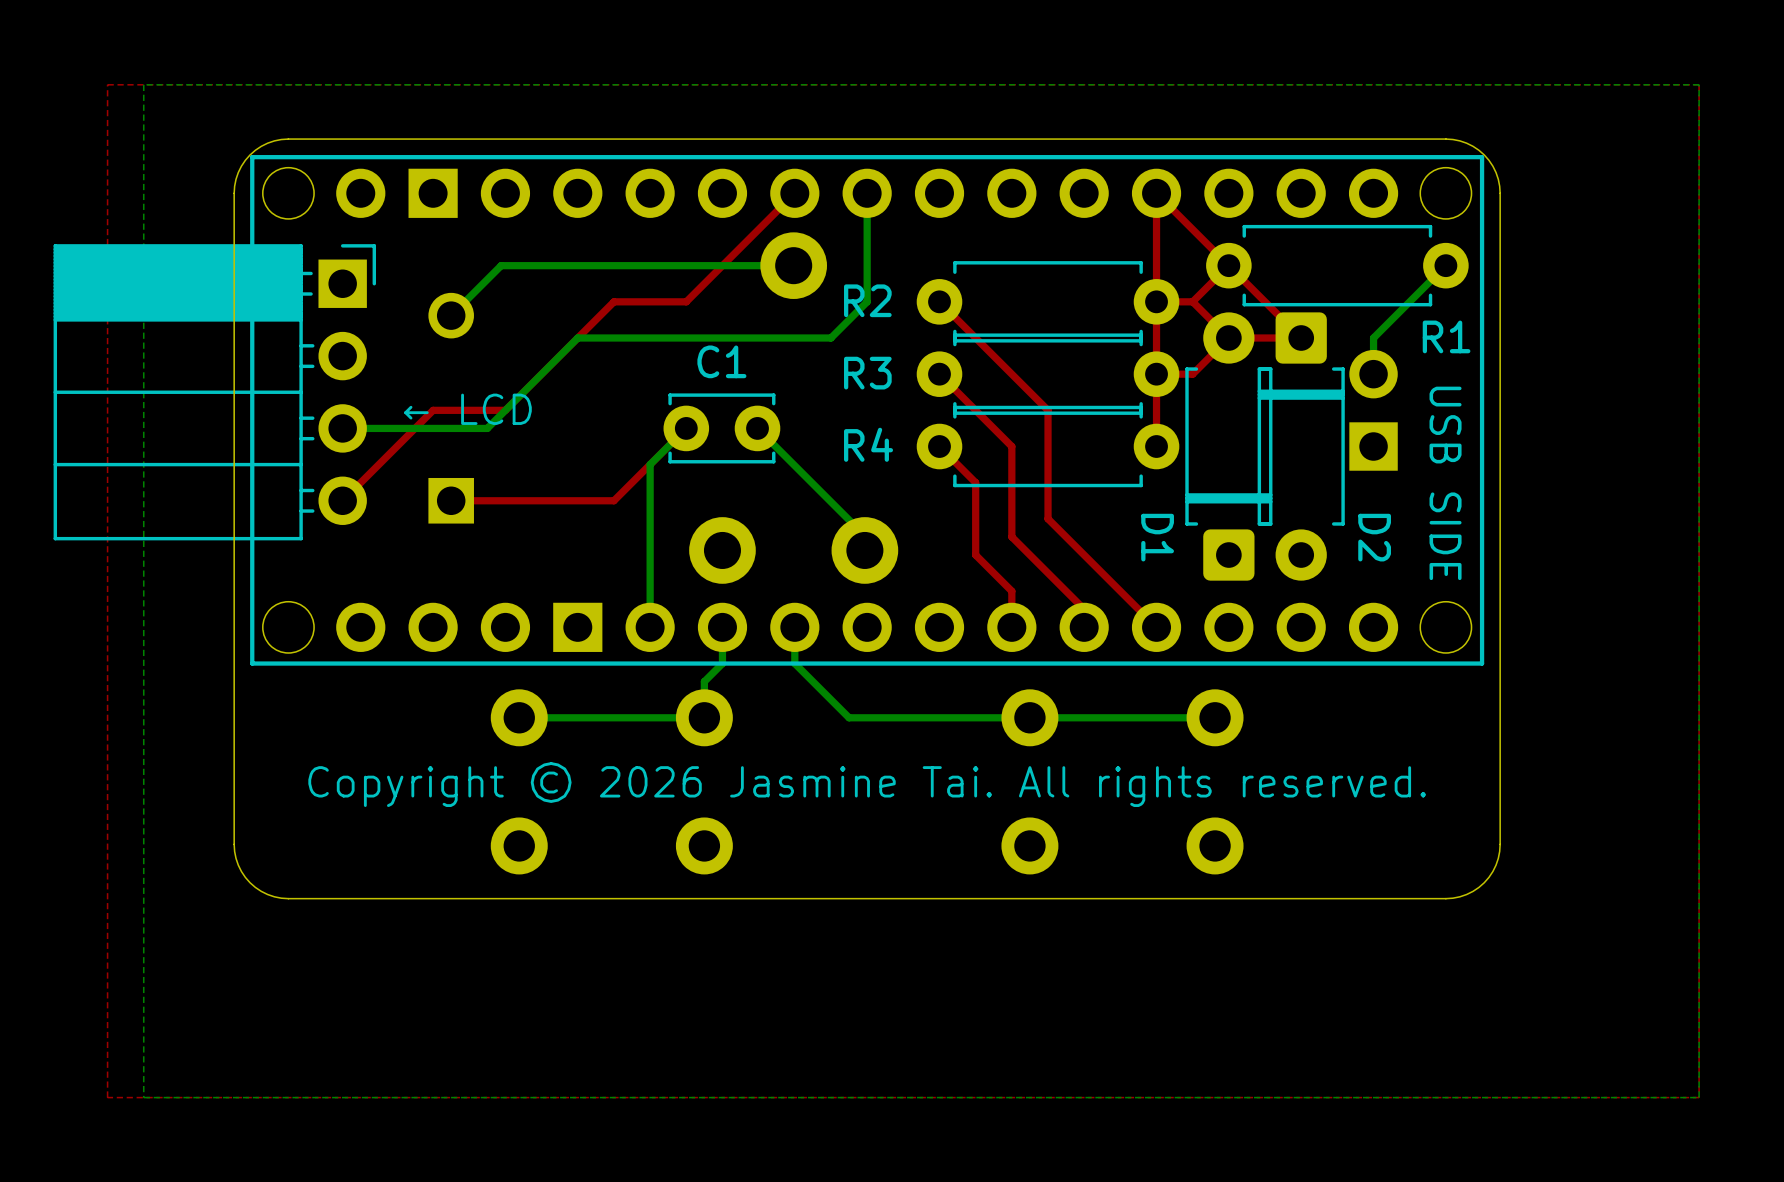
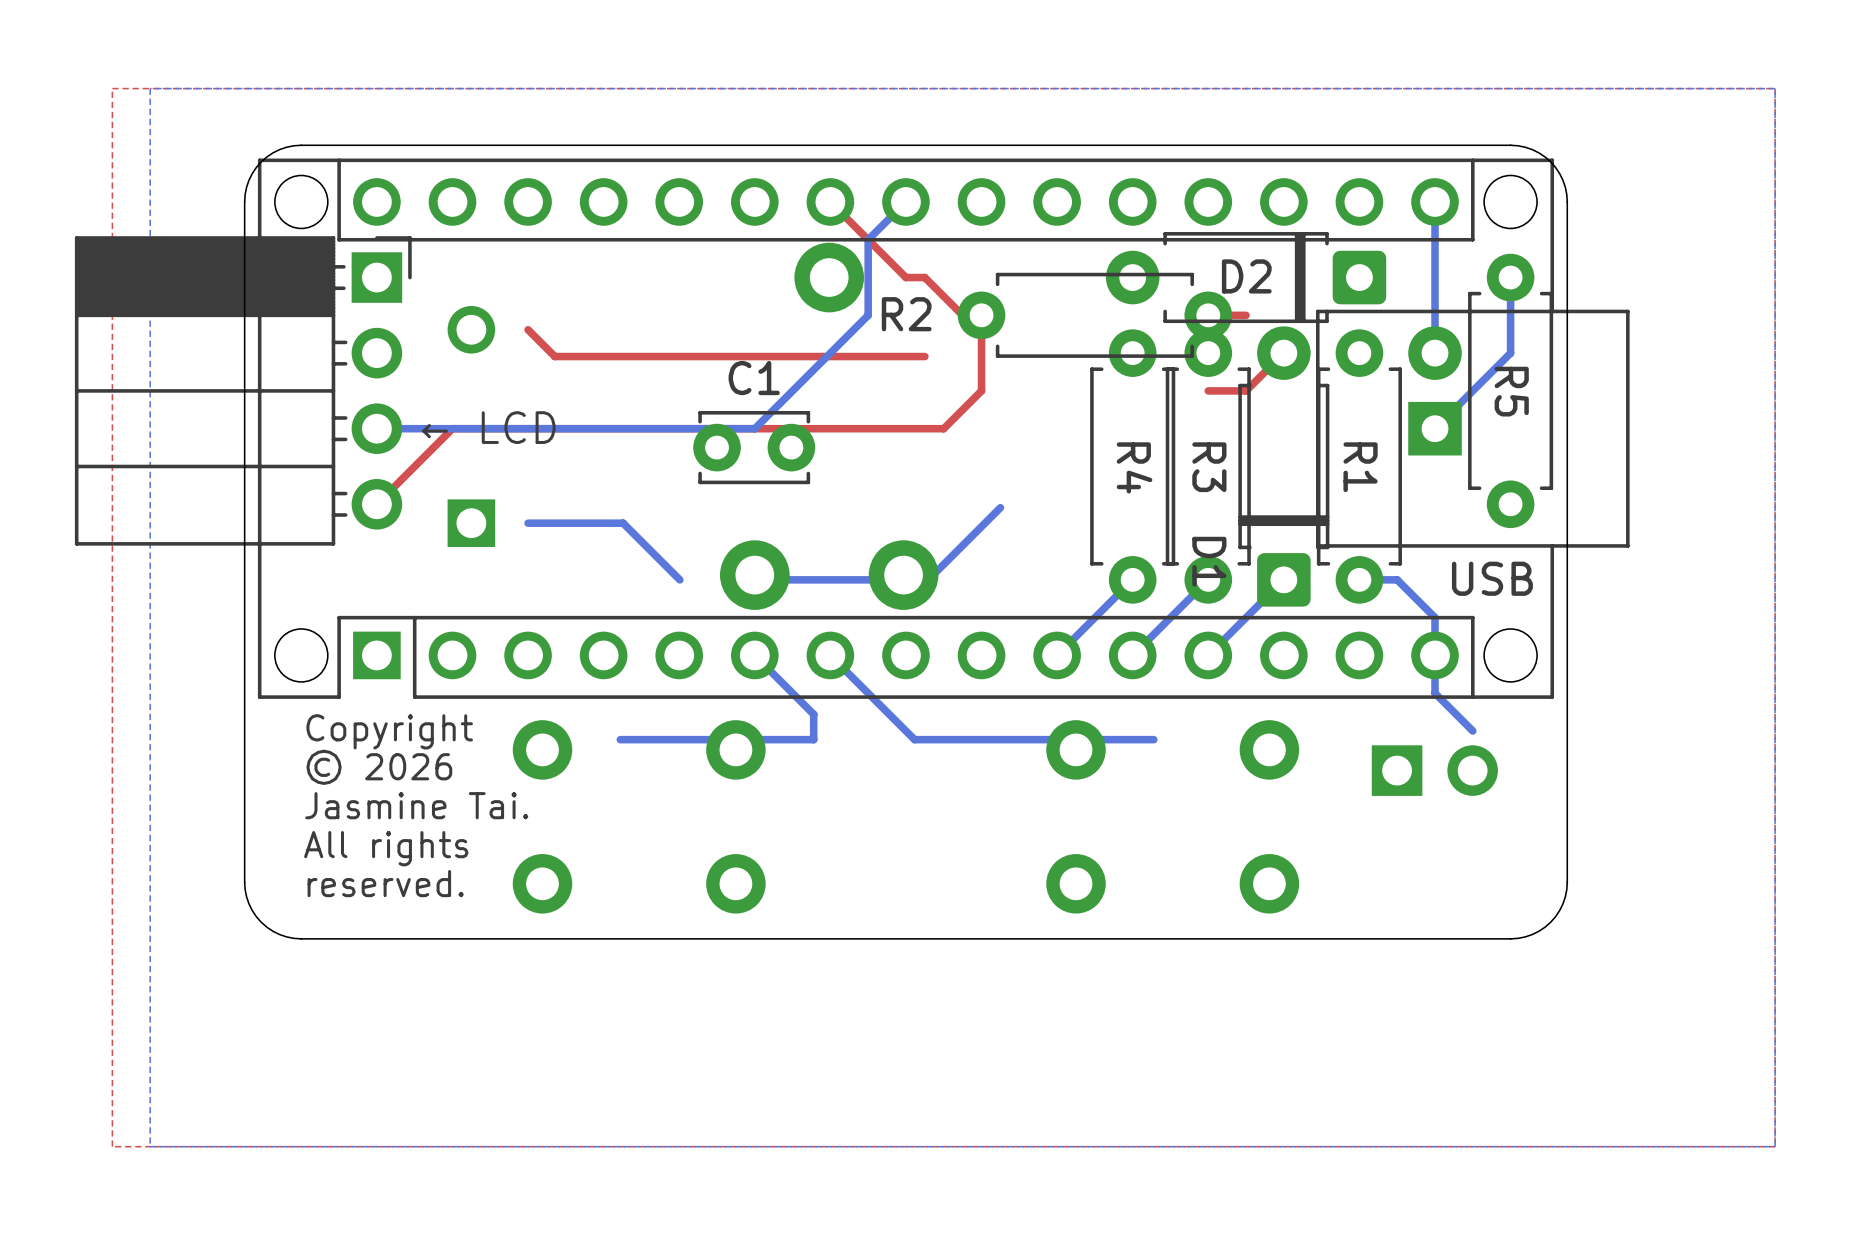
top track: (794, 193) (686, 301) (613, 301) (505, 410) -> (830, 201) (905, 277) (924, 277) (981, 334) (981, 390) (943, 428) (528, 428)
bottom track: (867, 193) (867, 301) (830, 338) (577, 338) (487, 428) (342, 428) -> (905, 201) (868, 239) (868, 315) (754, 428) (376, 428)
bottom track: none -> (1435, 201) (1435, 353)
bottom track: (793, 265) (501, 265) (451, 315) -> none
top track: (1228, 265) (1192, 301) (1228, 338) (1301, 338) (1156, 193) (1156, 446) -> none
R1 rotation: 0° (1337, 265) -> 90° clockwise (1359, 466)
R1 position: (1337, 265) -> (1359, 466)
bottom track: (1445, 265) (1373, 338) (1373, 374) -> (1510, 277) (1510, 353) (1435, 428)
top track: (939, 301) (1048, 410) (1048, 518) (1156, 627) -> none
top track: none -> (528, 329) (554, 356) (924, 356)
R1 name position: R1 (1446, 336) -> R1 (1360, 467)
R3 name position: R3 (867, 373) -> R3 (1209, 467)
top track: (939, 374) (1011, 446) (1011, 536) (1084, 609) (1084, 627) -> none
R3 rotation: 0° (1048, 374) -> 90° clockwise (1208, 466)
part: none -> (1435, 390)
R5: none -> (1510, 390)
part position: (214, 392) -> (243, 390)
part: (867, 410) -> none
part: none -> (943, 428)
part rotation: 0° (1373, 410) -> 90° clockwise (1434, 770)
part position: (1373, 410) -> (1434, 770)
top track: (686, 428) (613, 500) (451, 500) -> none
bottom track: (686, 428) (650, 464) (650, 627) -> none
bottom track: (757, 428) (864, 535) (864, 550) (860, 550) -> none
R4 name position: R4 (868, 444) -> R4 (1134, 467)
top track: (939, 446) (975, 482) (975, 555) (1011, 591) (1011, 627) -> none
R4 rotation: 0° (1048, 446) -> 90° clockwise (1132, 466)
D2 rotation: 0° (1301, 446) -> 90° clockwise (1246, 277)
D2 position: (1301, 446) -> (1246, 277)
text: USB SIDE (1445, 483) -> none
bottom track: none -> (1000, 507) (928, 579) (754, 579)
bottom track: none -> (528, 523) (623, 523) (679, 579)
D2 name position: D2 (1374, 537) -> D2 (1246, 276)
bottom track: none -> (1132, 579) (1057, 655)
bottom track: none -> (1208, 579) (1132, 655)
bottom track: none -> (1283, 579) (1208, 655)
bottom track: none -> (1359, 579) (1397, 579) (1435, 617) (1435, 693) (1472, 731)
bottom track: (722, 627) (722, 663) (704, 681) (704, 717) (519, 717) -> (754, 655) (813, 714) (813, 739) (620, 739)
bottom track: (794, 627) (794, 663) (849, 717) (1215, 717) -> (830, 655) (914, 739) (1153, 739)
text: none -> Copyright (389, 731)
text: none -> © 2026 (379, 767)
text: none -> Jasmine Tai. (416, 805)
text: Copyright © 2026 Jasmine Tai. All rights reserved. (867, 784) -> none
text: none -> All rights (386, 848)
text: none -> reserved. (385, 883)

